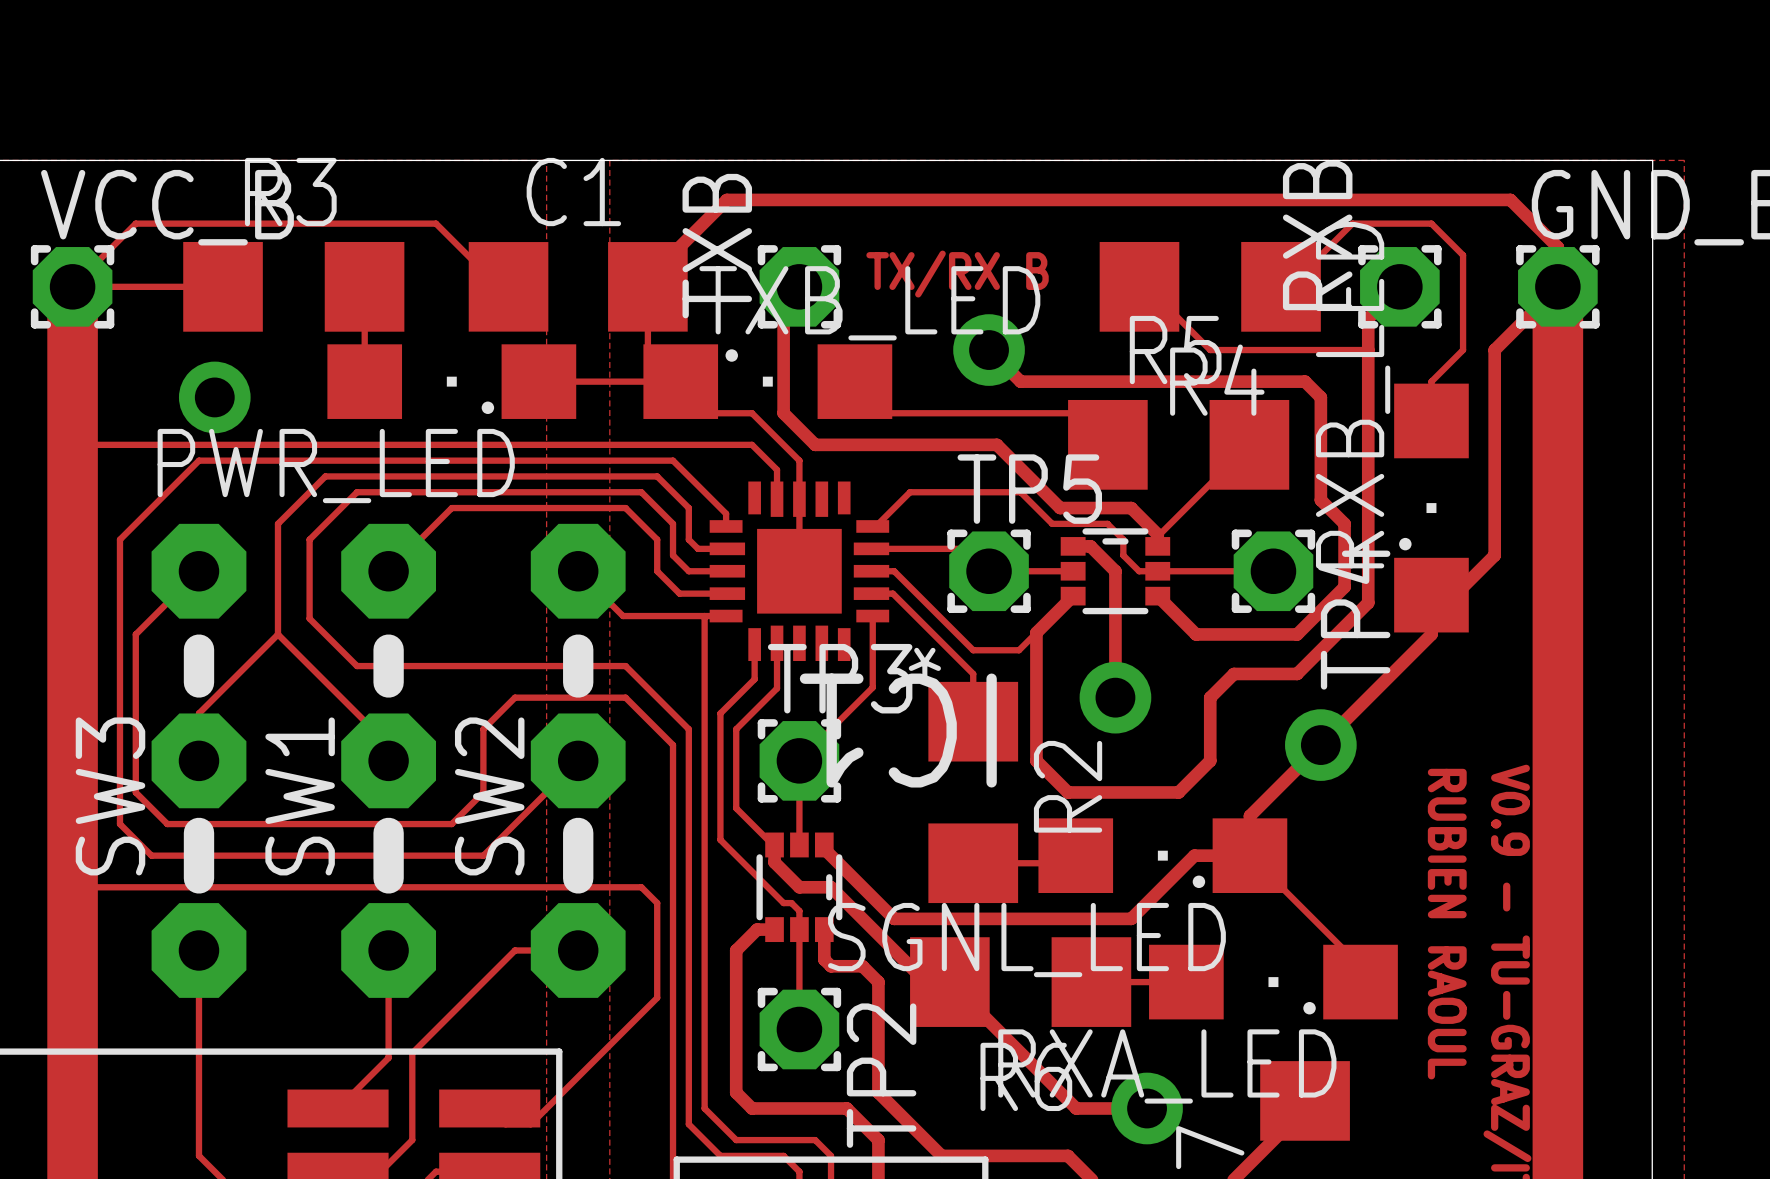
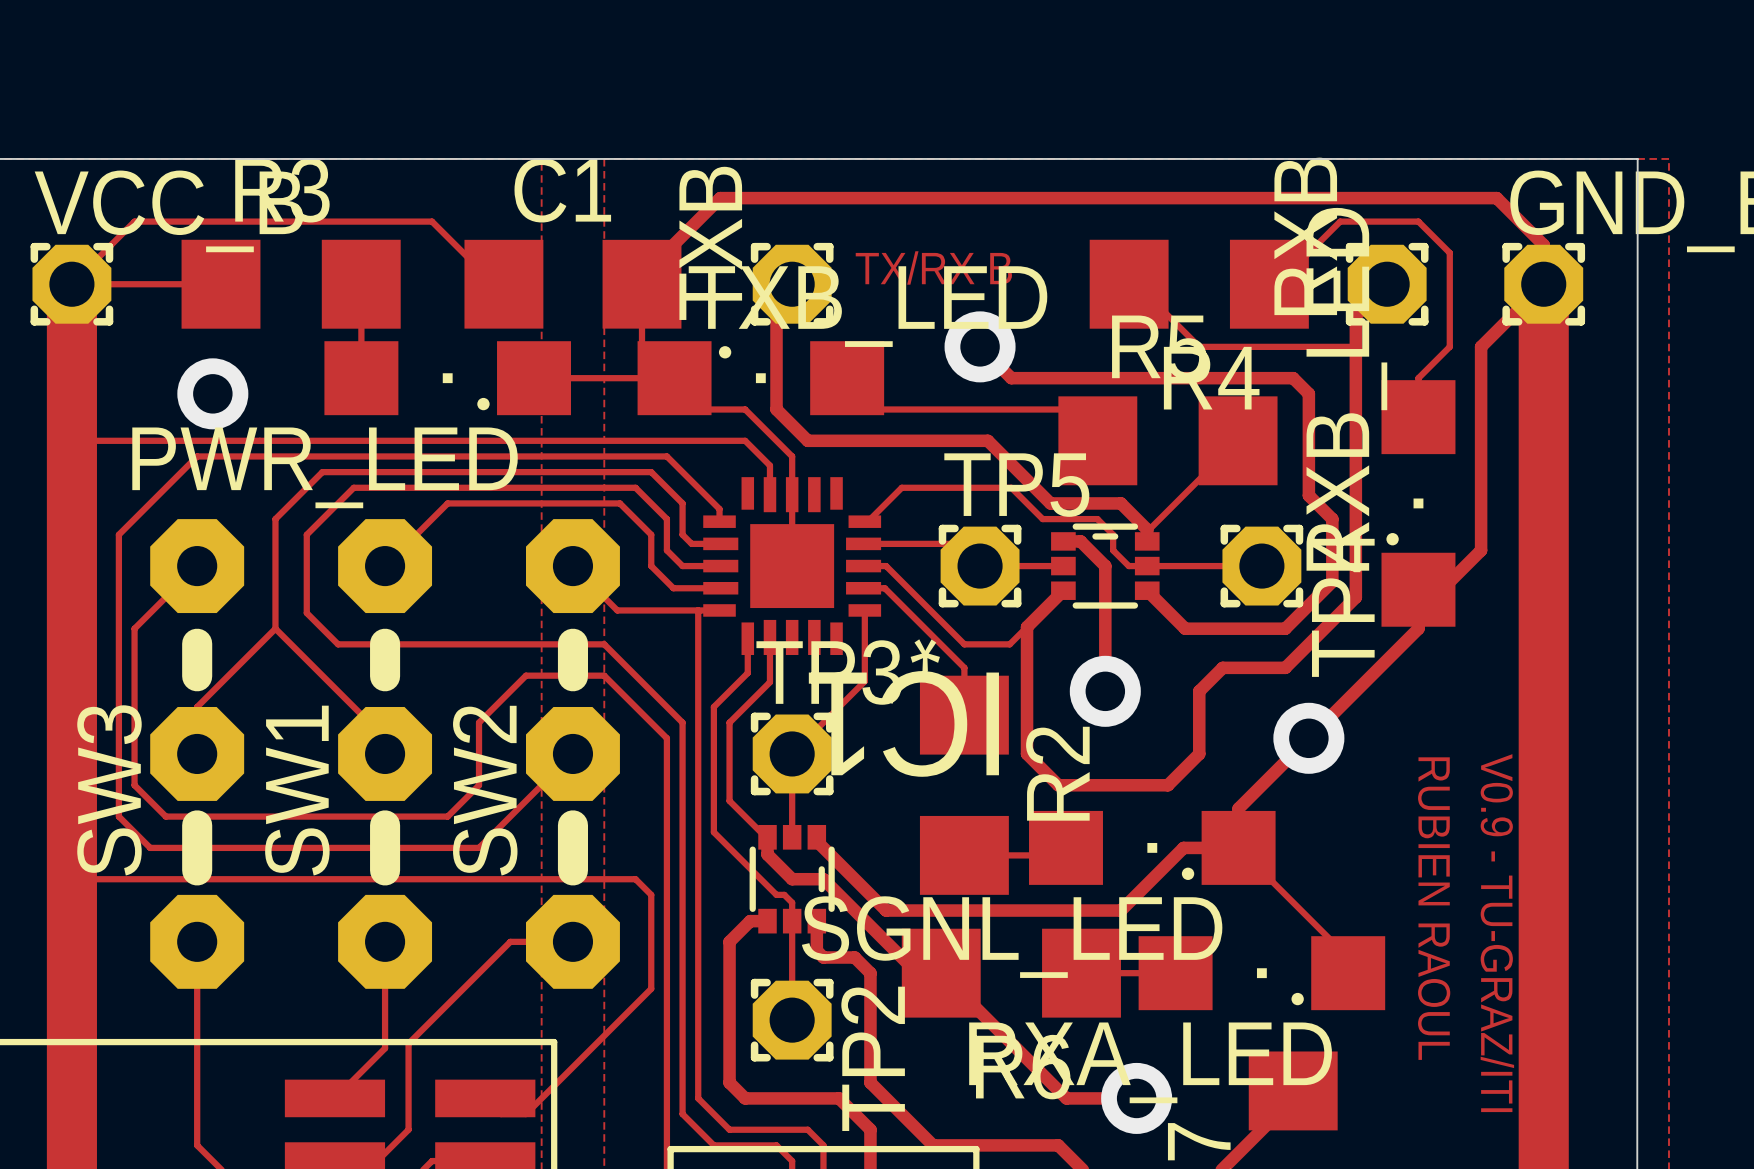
track: (341, 650) (357, 666) (625, 666) -> (338, 644) (604, 644) (619, 660)
track: (515, 697) (625, 697) -> (510, 691) (525, 675) (604, 675) (619, 691)

